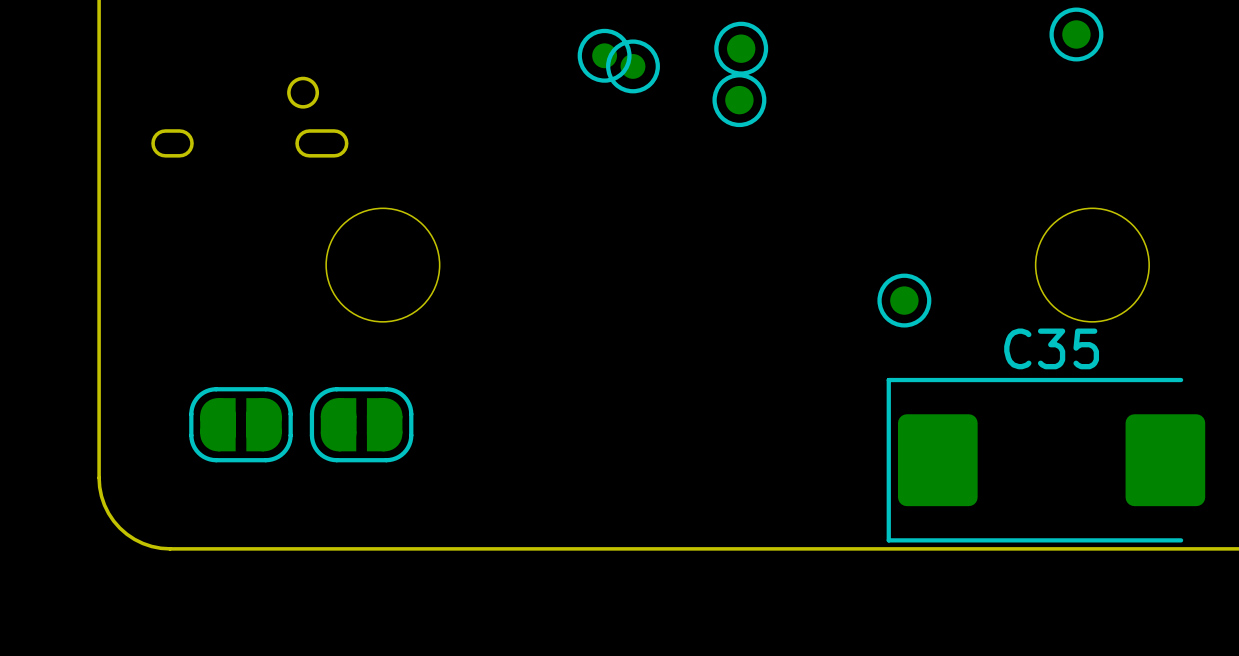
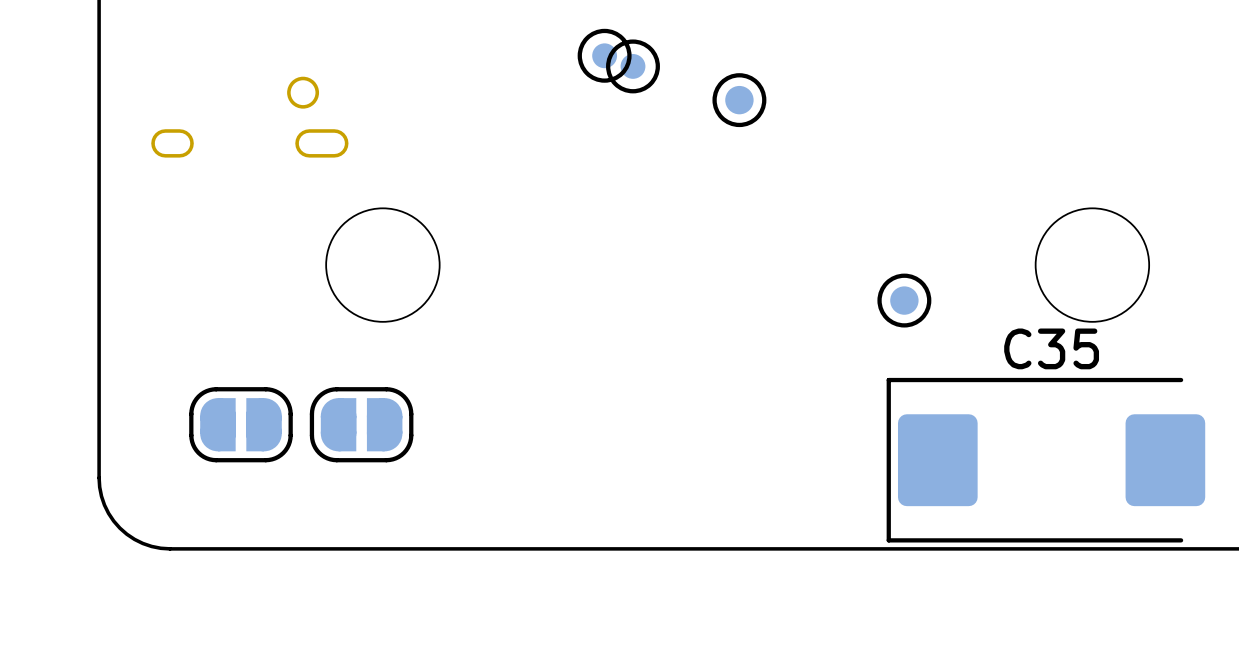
part: (1076, 34) -> none
part: (741, 48) -> none

